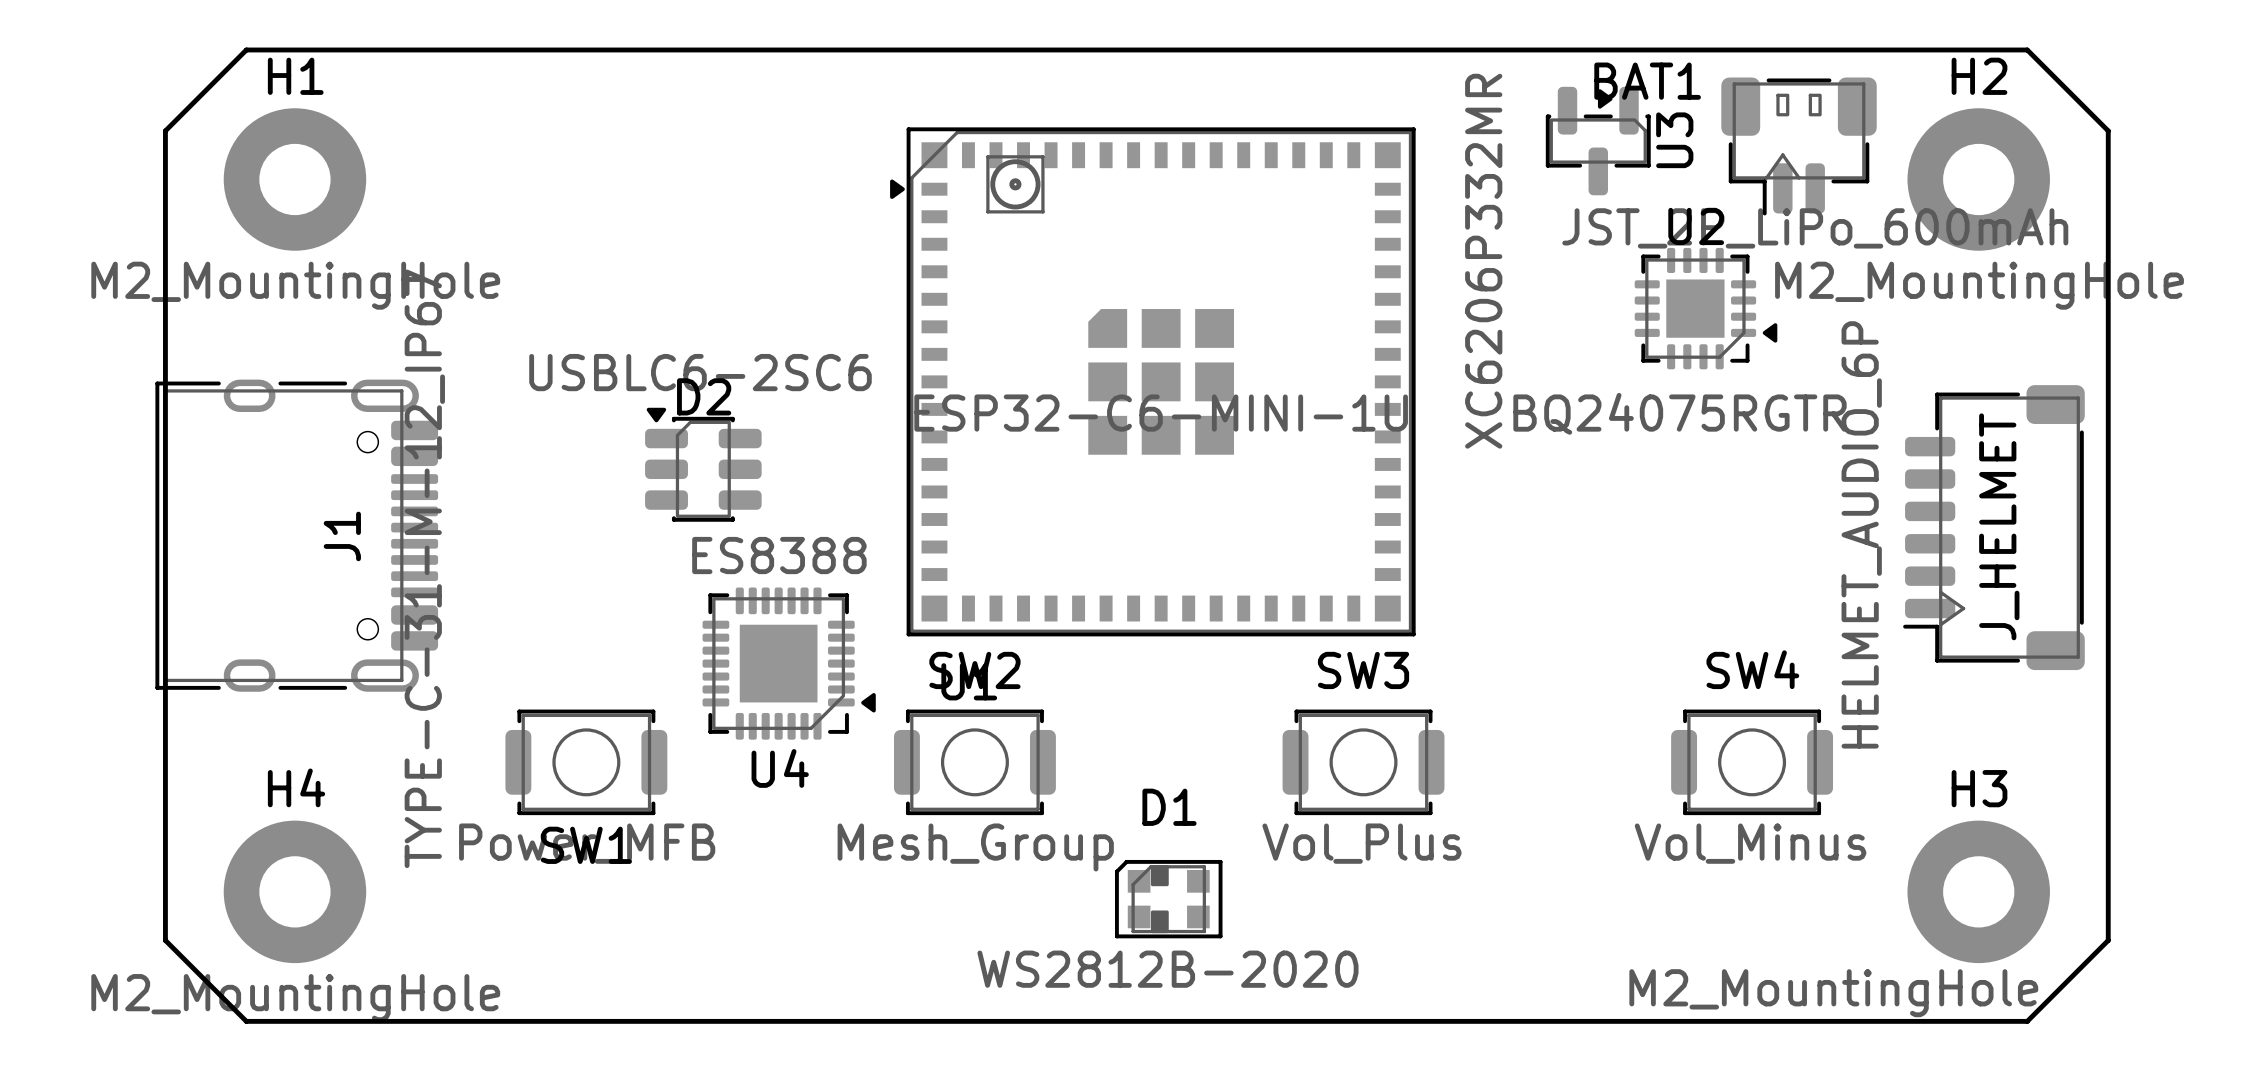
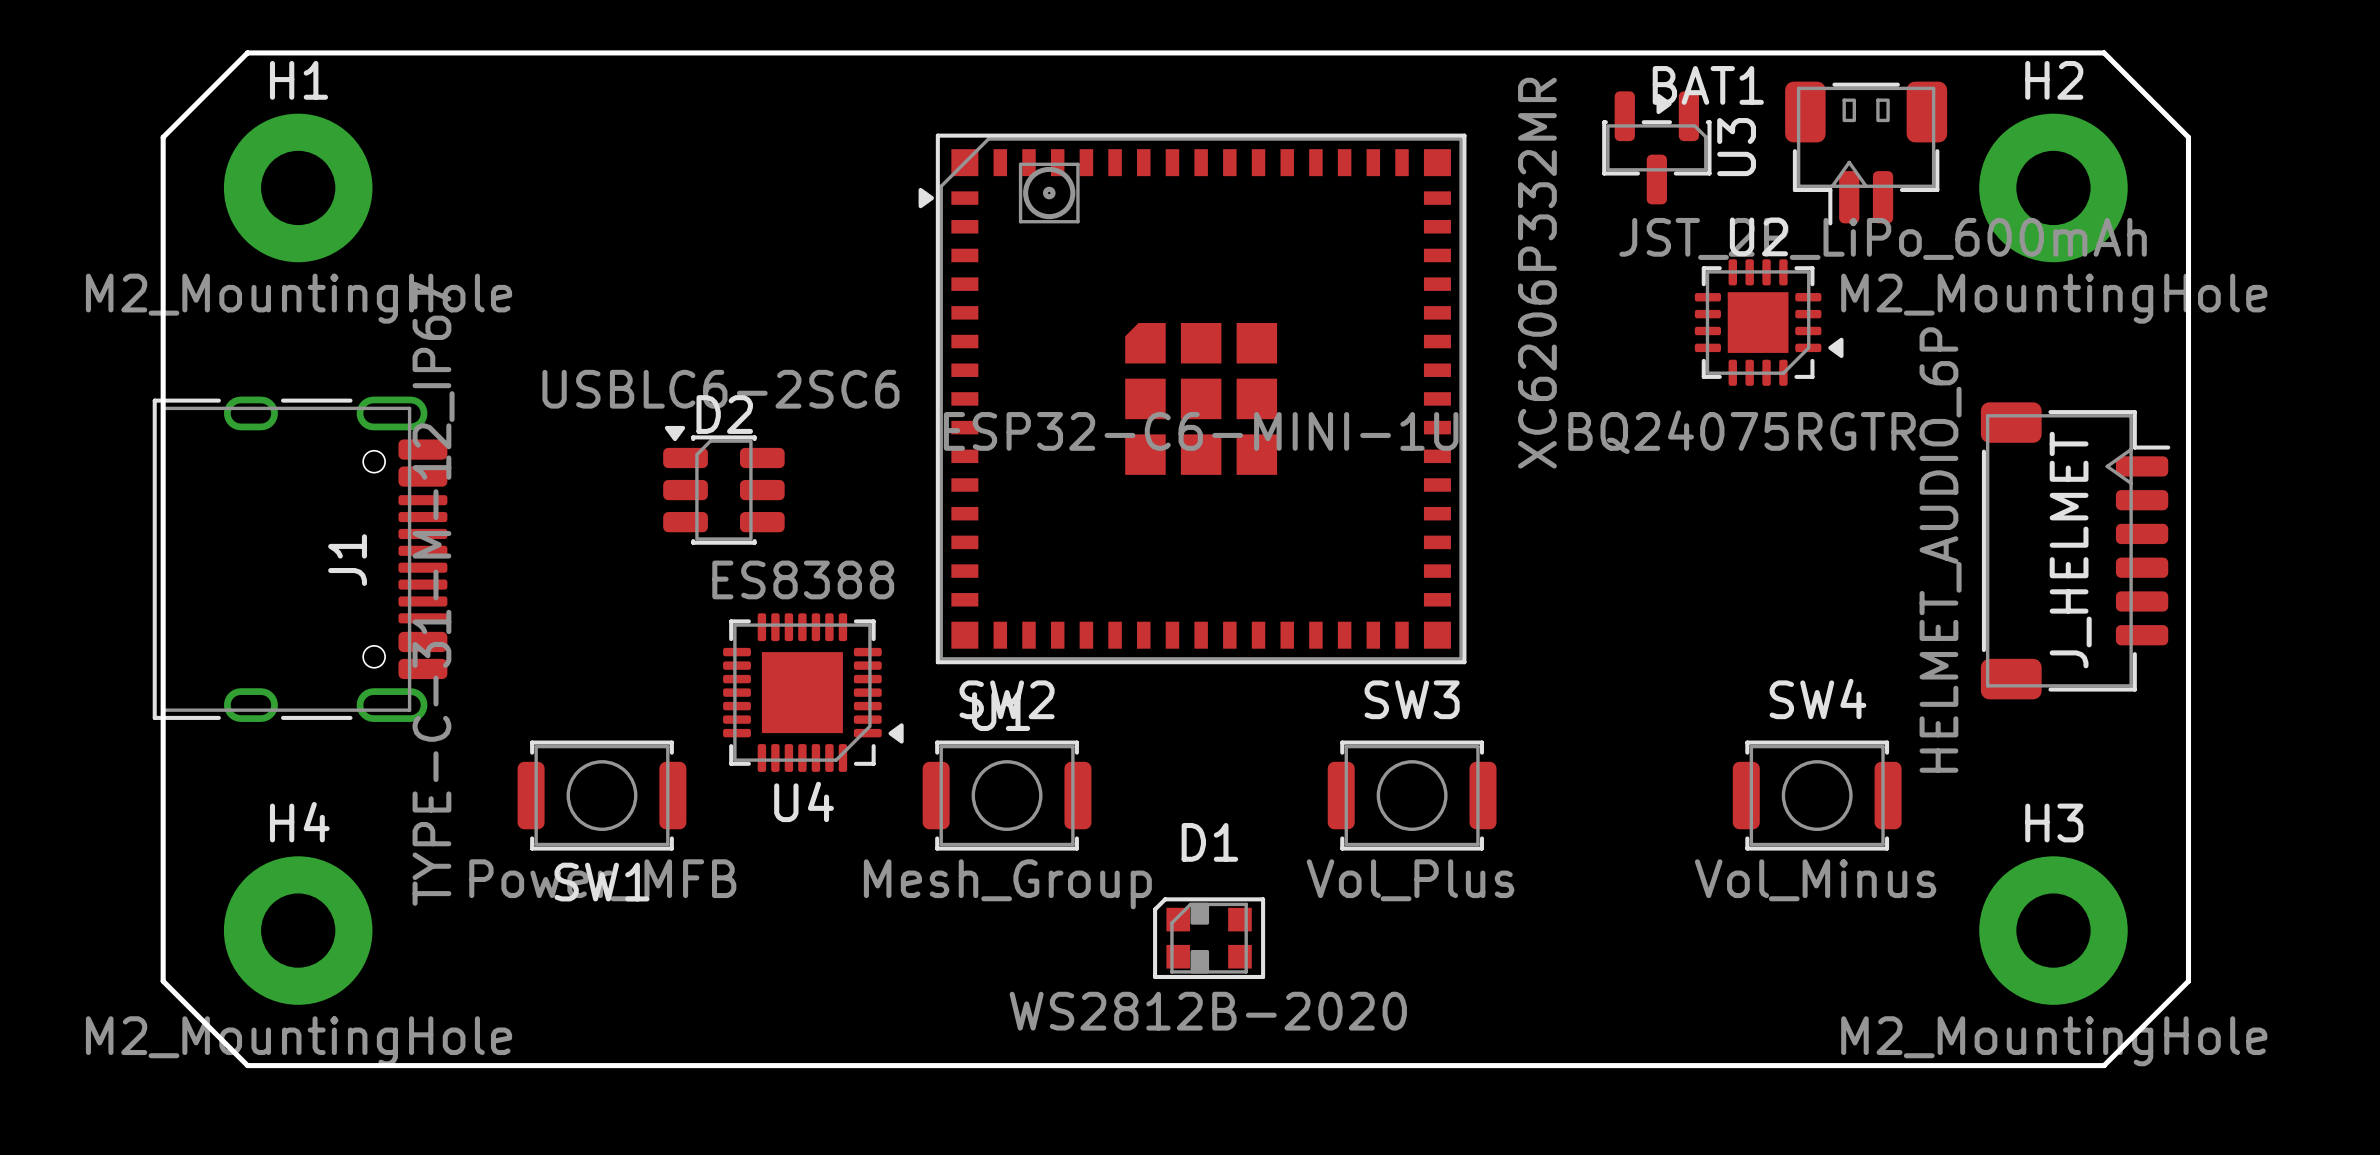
J_HELMET rotation: 0° (1993, 527) -> 180° (2075, 550)
H3 value position: M2_MountingHole (1833, 993) -> M2_MountingHole (2054, 1041)

